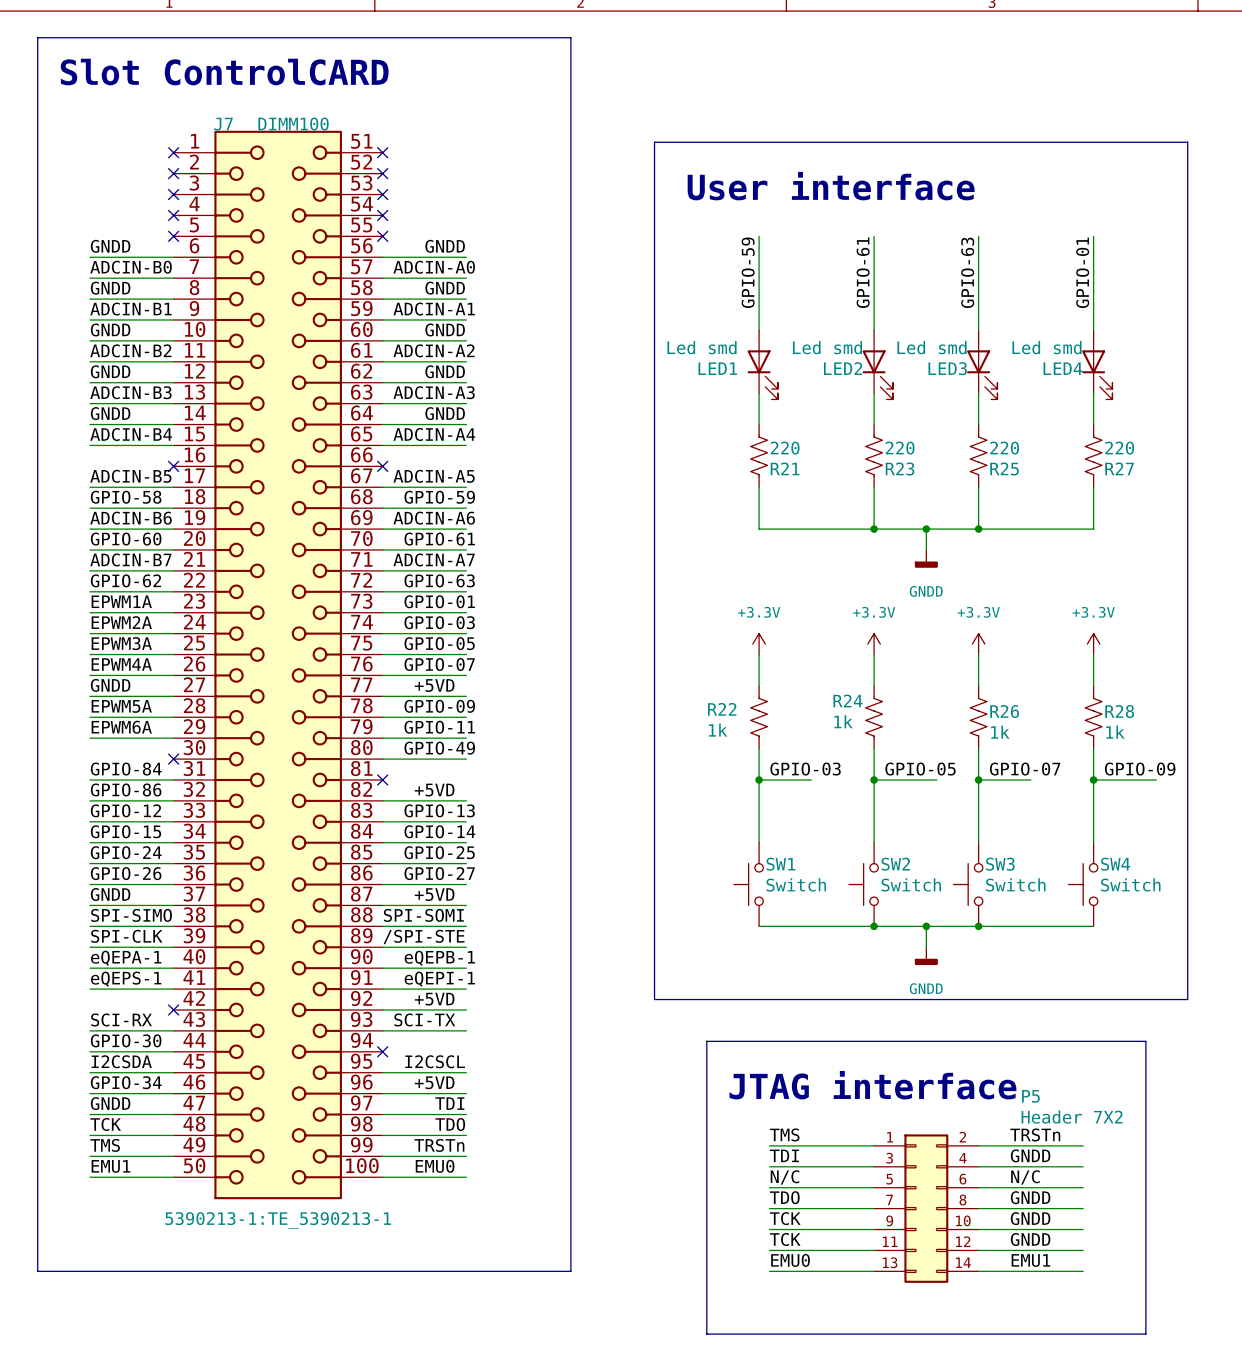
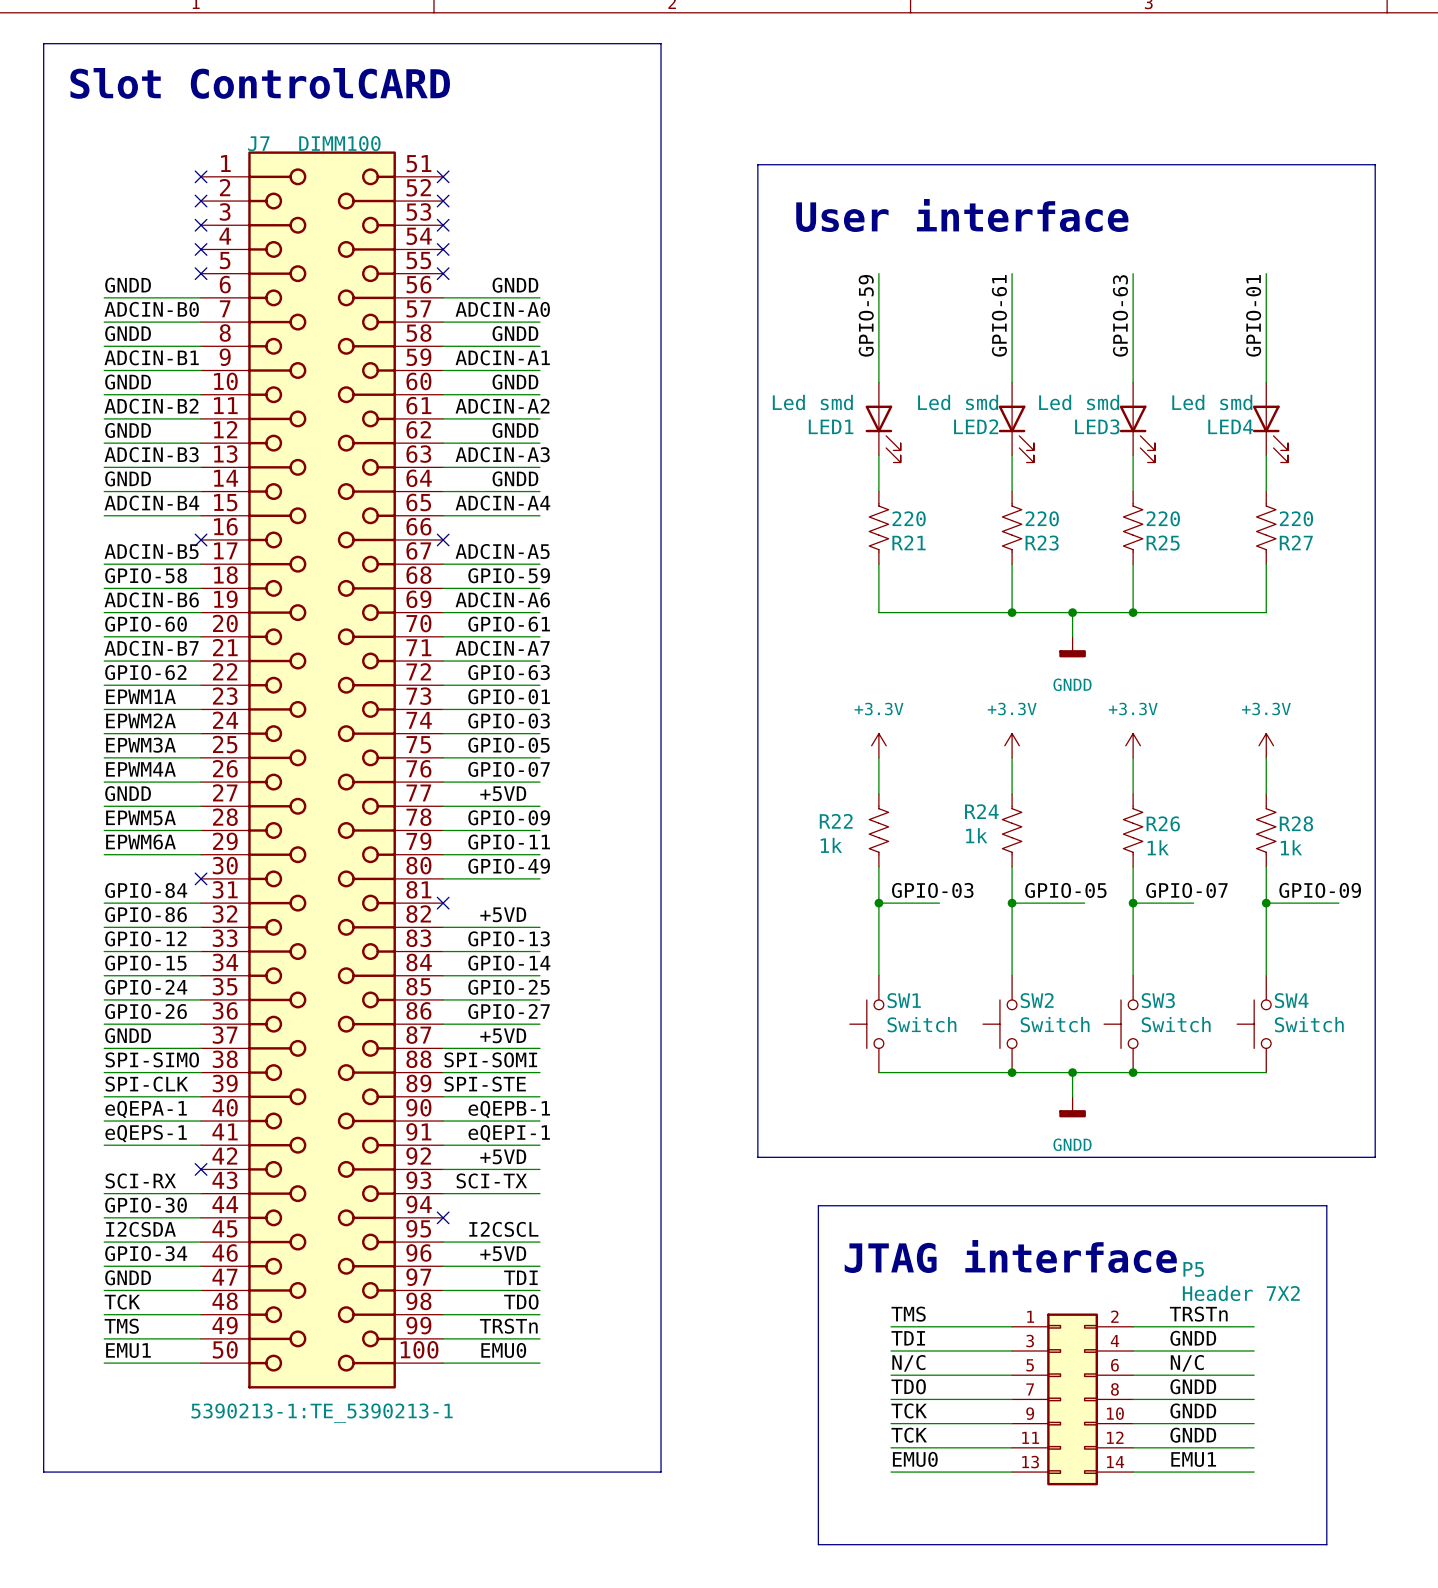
label: /SPI-STE (424, 937) -> SPI-STE (485, 1084)

